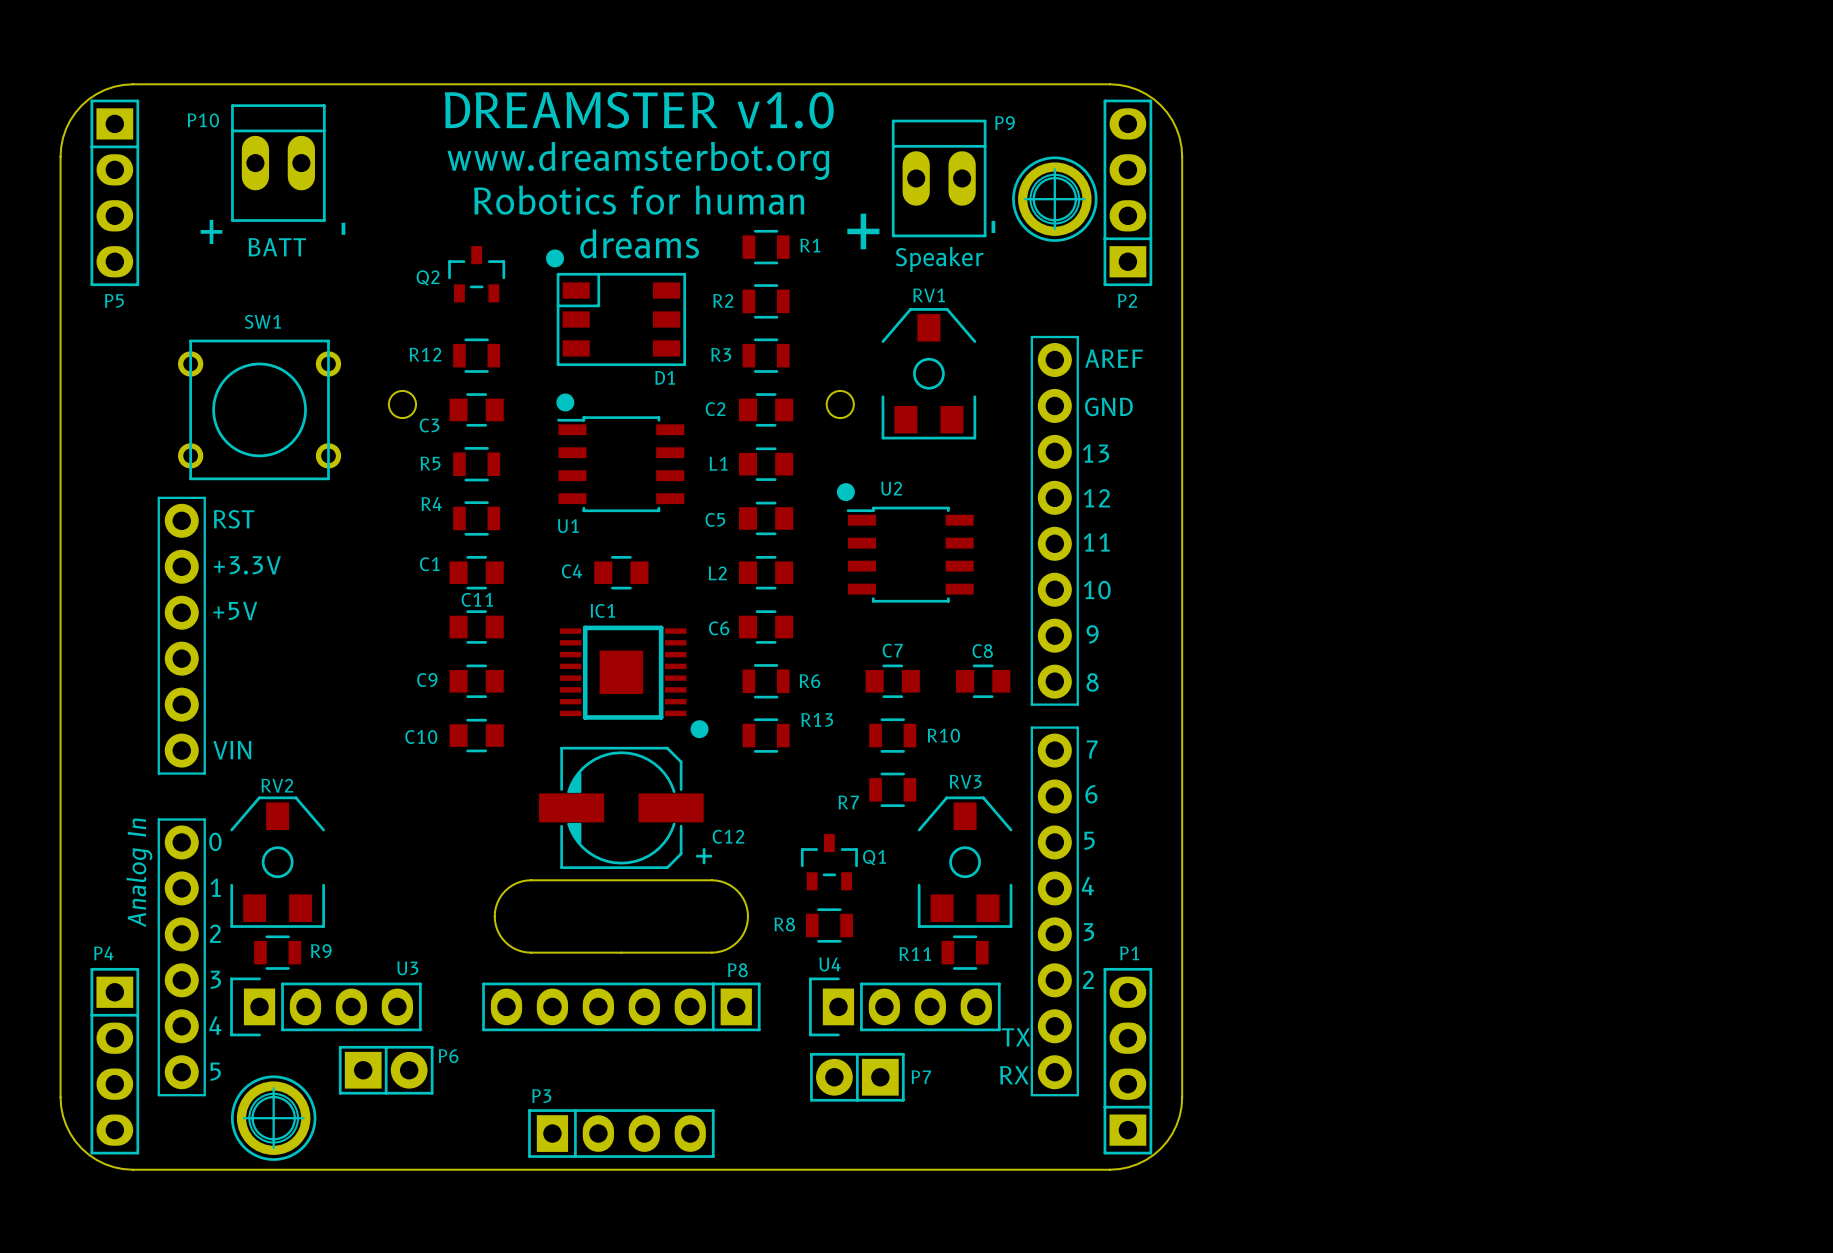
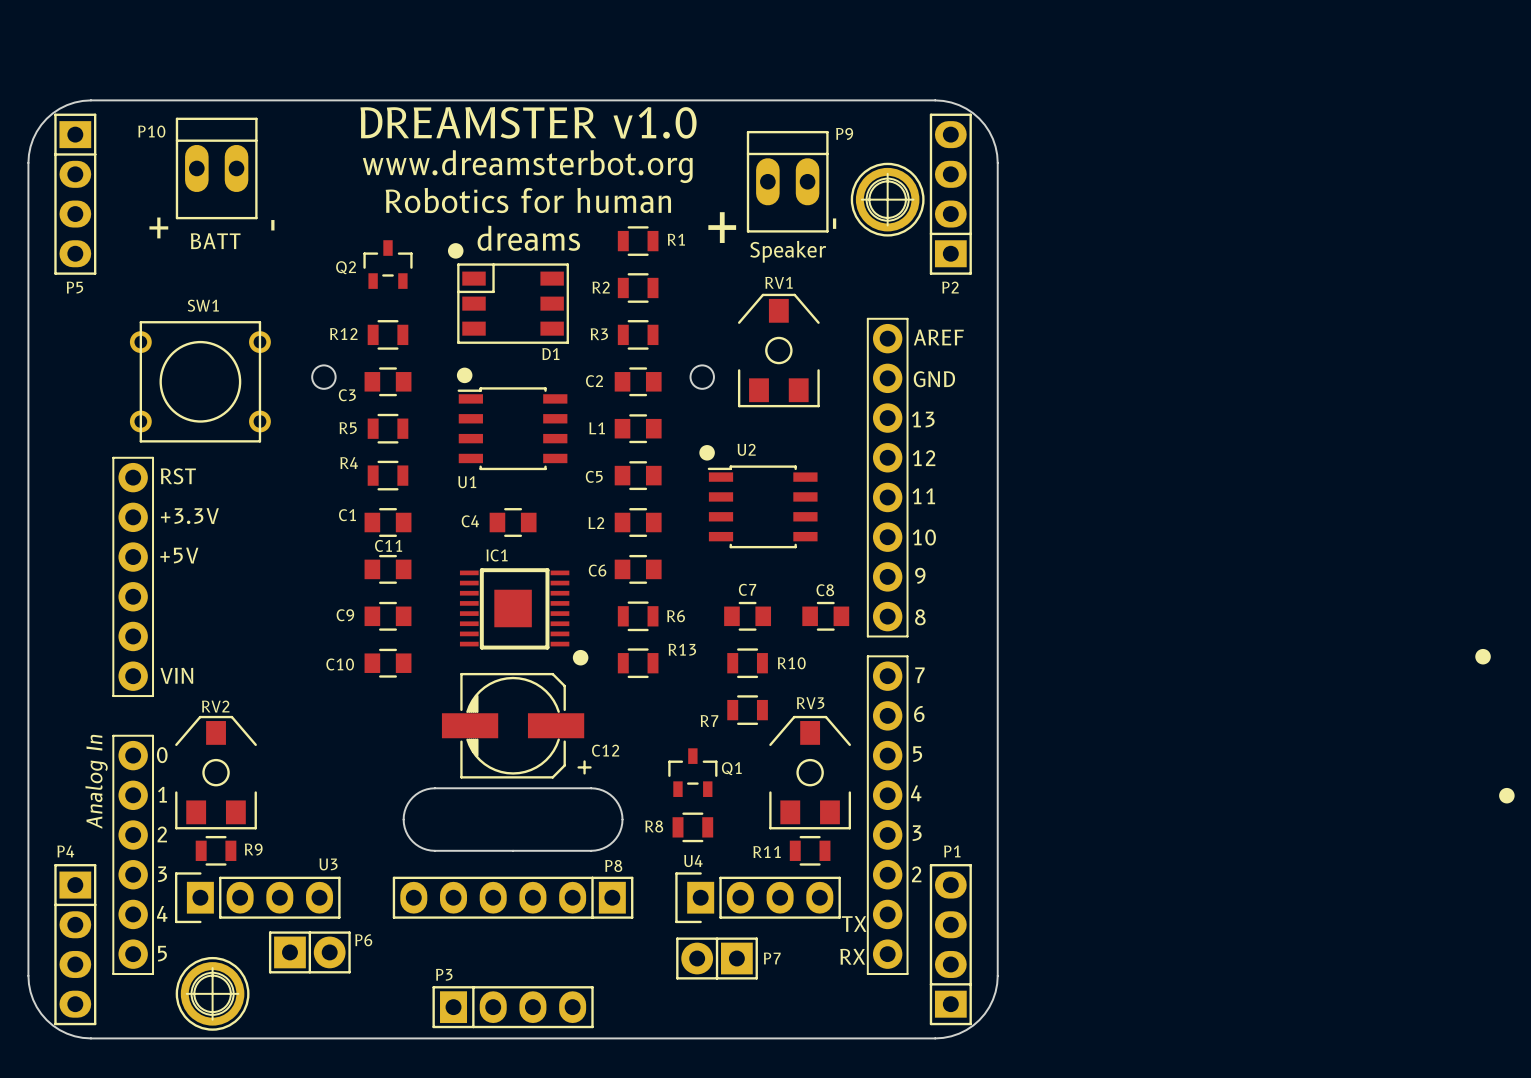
drawing: none -> [1475, 648, 1491, 665]
drawing: none -> [1499, 787, 1515, 804]

